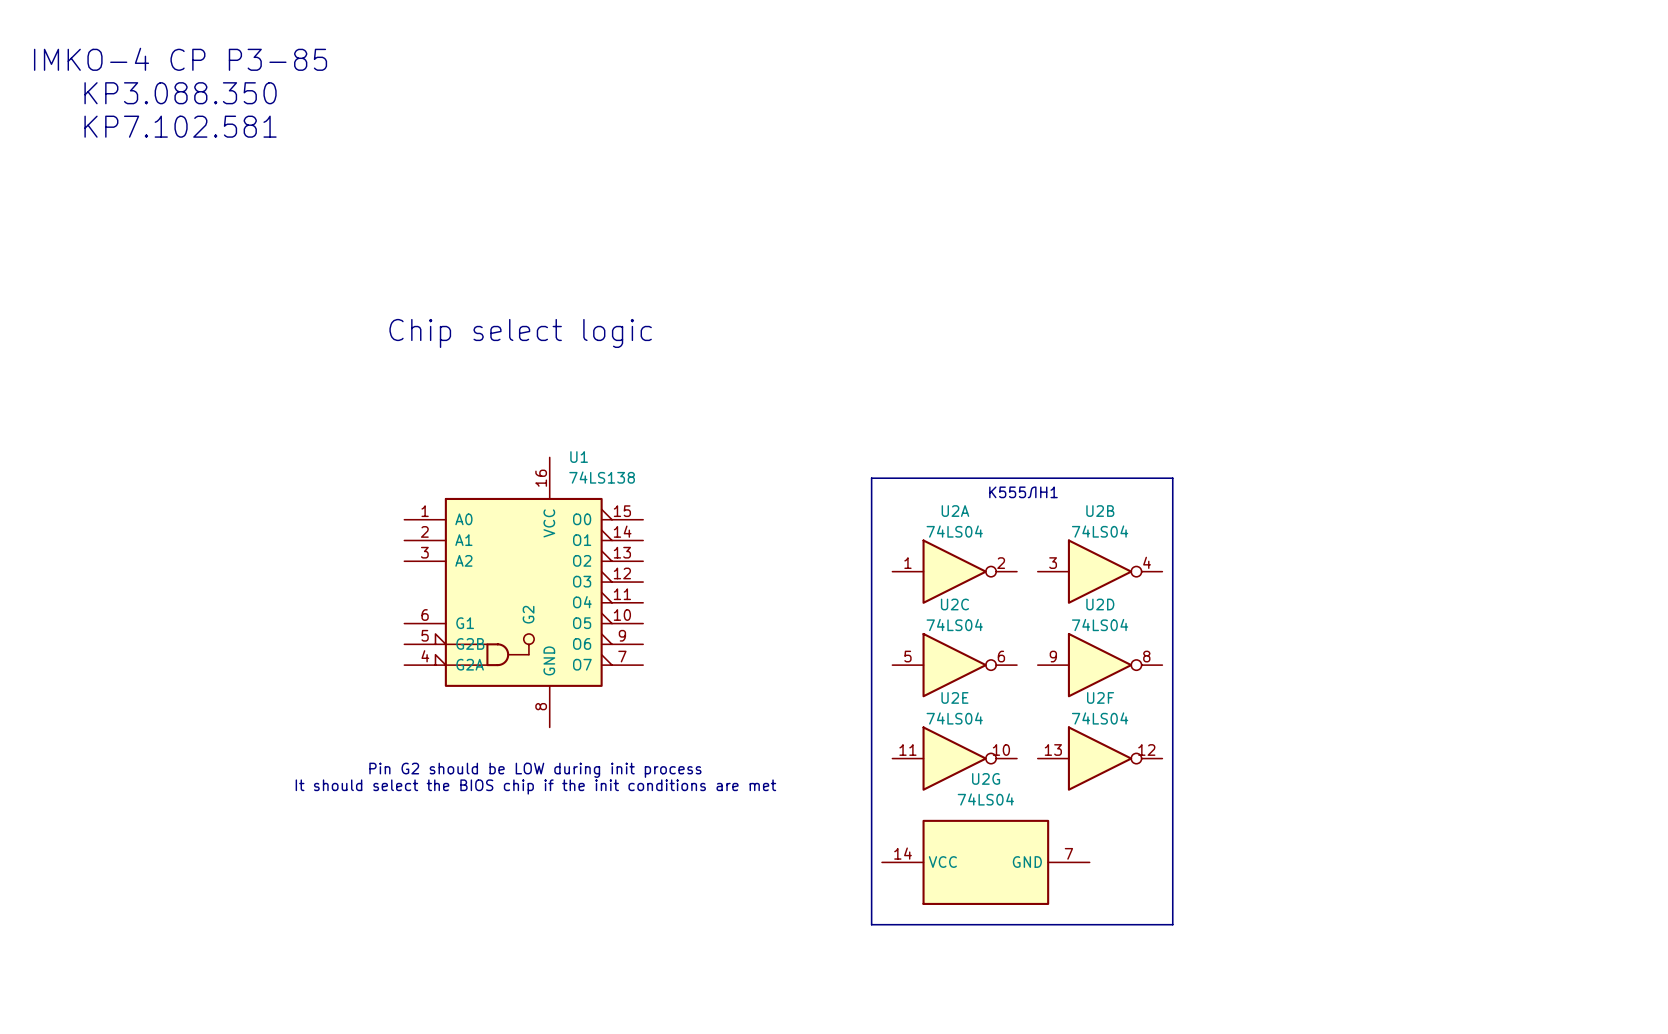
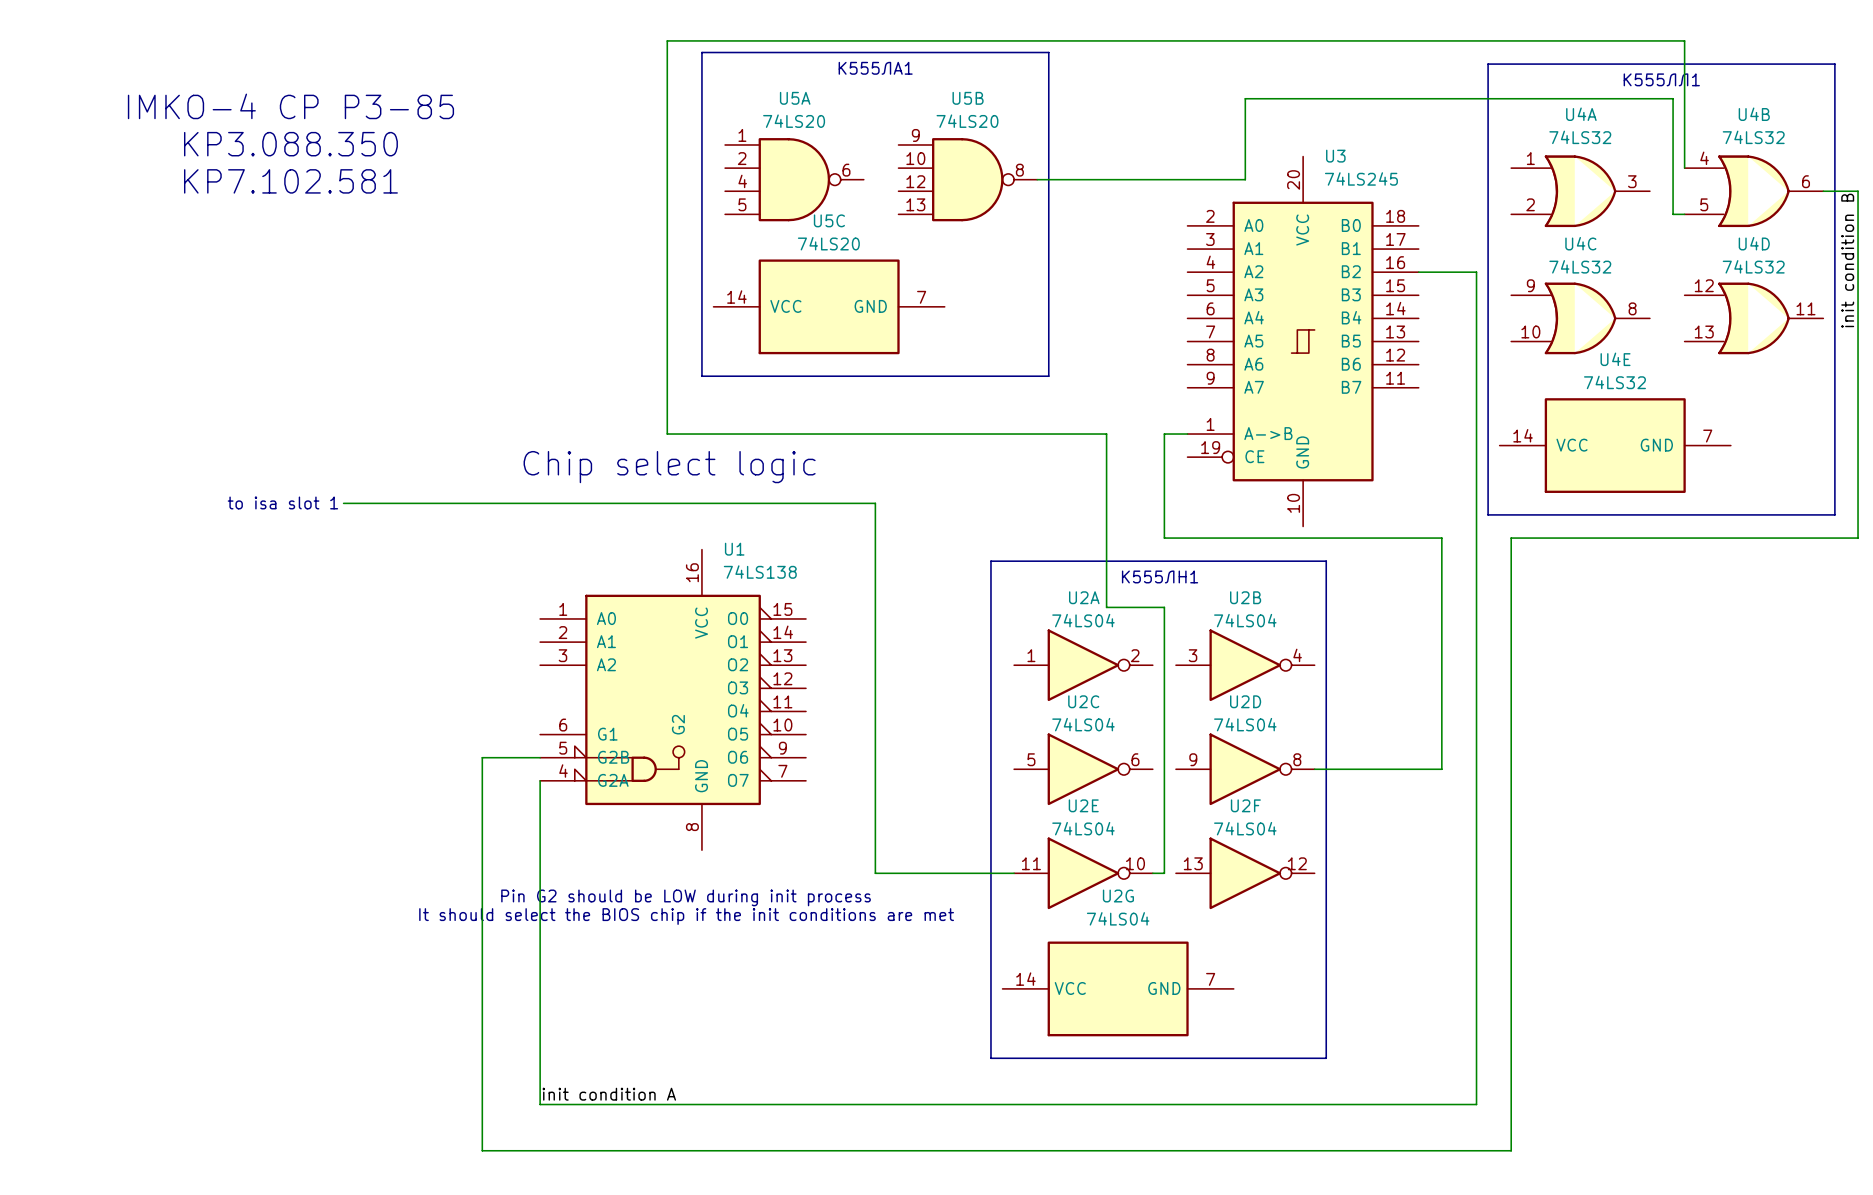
line: none -> (701, 52) (1048, 52) (1048, 376) (701, 376) (701, 52)
line: none -> (1488, 64) (1834, 64) (1834, 514) (1488, 514) (1488, 64)
text: none -> К555ЛА1 (875, 68)
text: none -> К555ЛЛ1 (1661, 79)
text position: IMKO-4 CP P3-85 (180, 59) -> IMKO-4 CP P3-85 (290, 106)
text position: KP3.088.350 (180, 93) -> KP3.088.350 (290, 144)
wire: none -> (1684, 168) (1684, 40) (667, 40) (667, 434) (1106, 434) (1106, 607) (1164, 607) (1164, 873) (1152, 873)
text position: KP7.102.581 (180, 126) -> KP7.102.581 (290, 181)
U5A: none -> 74LS20 (794, 179)
U5B: none -> 74LS20 (967, 179)
wire: none -> (1037, 179) (1245, 179) (1245, 98) (1673, 98) (1673, 214) (1684, 214)
U4A: none -> 74LS32 (1580, 191)
U4B: none -> 74LS32 (1753, 191)
wire: none -> (1823, 191) (1858, 191) (1858, 538) (1511, 538) (1511, 1150) (482, 1150) (482, 757) (540, 757)
label: none -> init condition B (1847, 260)
wire: none -> (1418, 272) (1476, 272) (1476, 1104) (540, 1104) (540, 780)
U5C: none -> 74LS20 (829, 306)
U4C: none -> 74LS32 (1580, 318)
U4D: none -> 74LS32 (1753, 318)
U3: none -> 74LS245 (1303, 341)
text position: Chip select logic (520, 333) -> Chip select logic (669, 467)
wire: none -> (1187, 434) (1164, 434) (1164, 538) (1441, 538) (1441, 769) (1314, 769)
U4E: none -> 74LS32 (1615, 445)
text: none -> to isa slot 1 (282, 502)
wire: none -> (343, 503) (875, 503) (875, 873) (1014, 873)
U1 position: (523, 592) -> (673, 699)
text position: Pin G2 should be LOW during init process (535, 770) -> Pin G2 should be LOW during init process (686, 897)
text position: It should select the BIOS chip if the init conditions are met (535, 786) -> It should select the BIOS chip if the init conditions are met (686, 916)
label: none -> init condition A (609, 1094)

